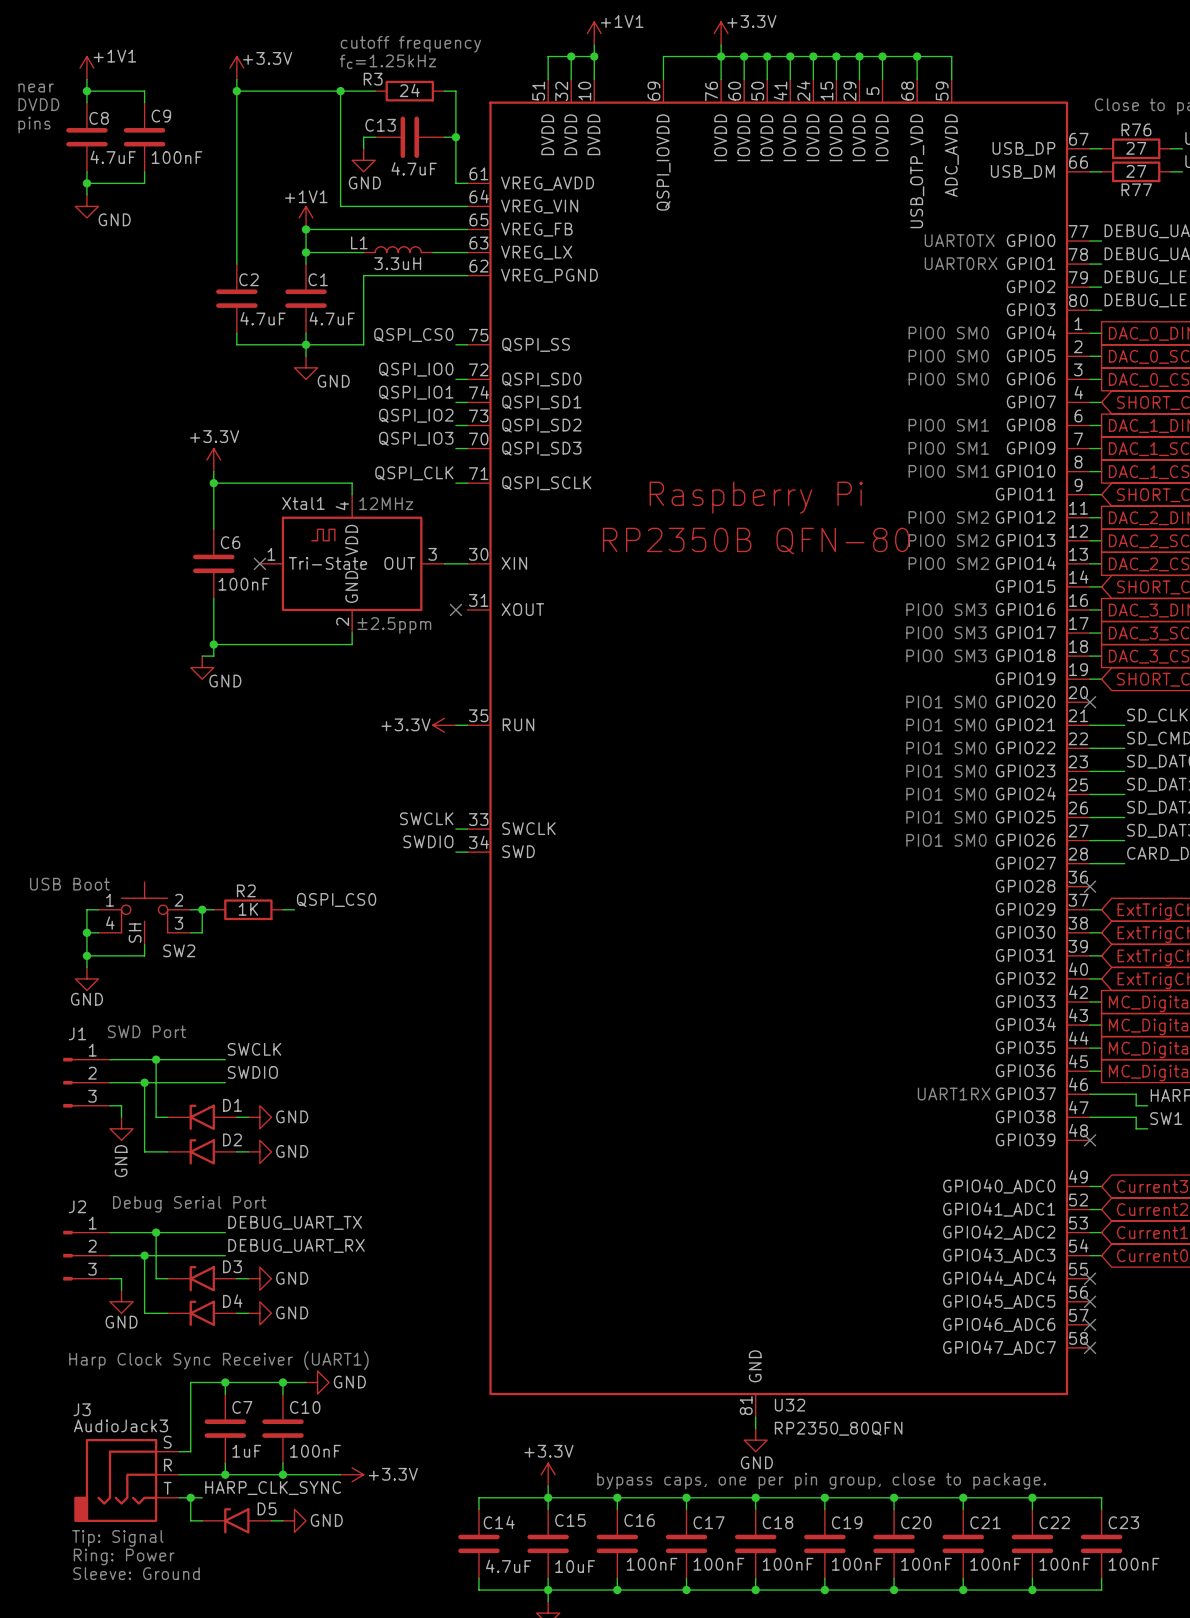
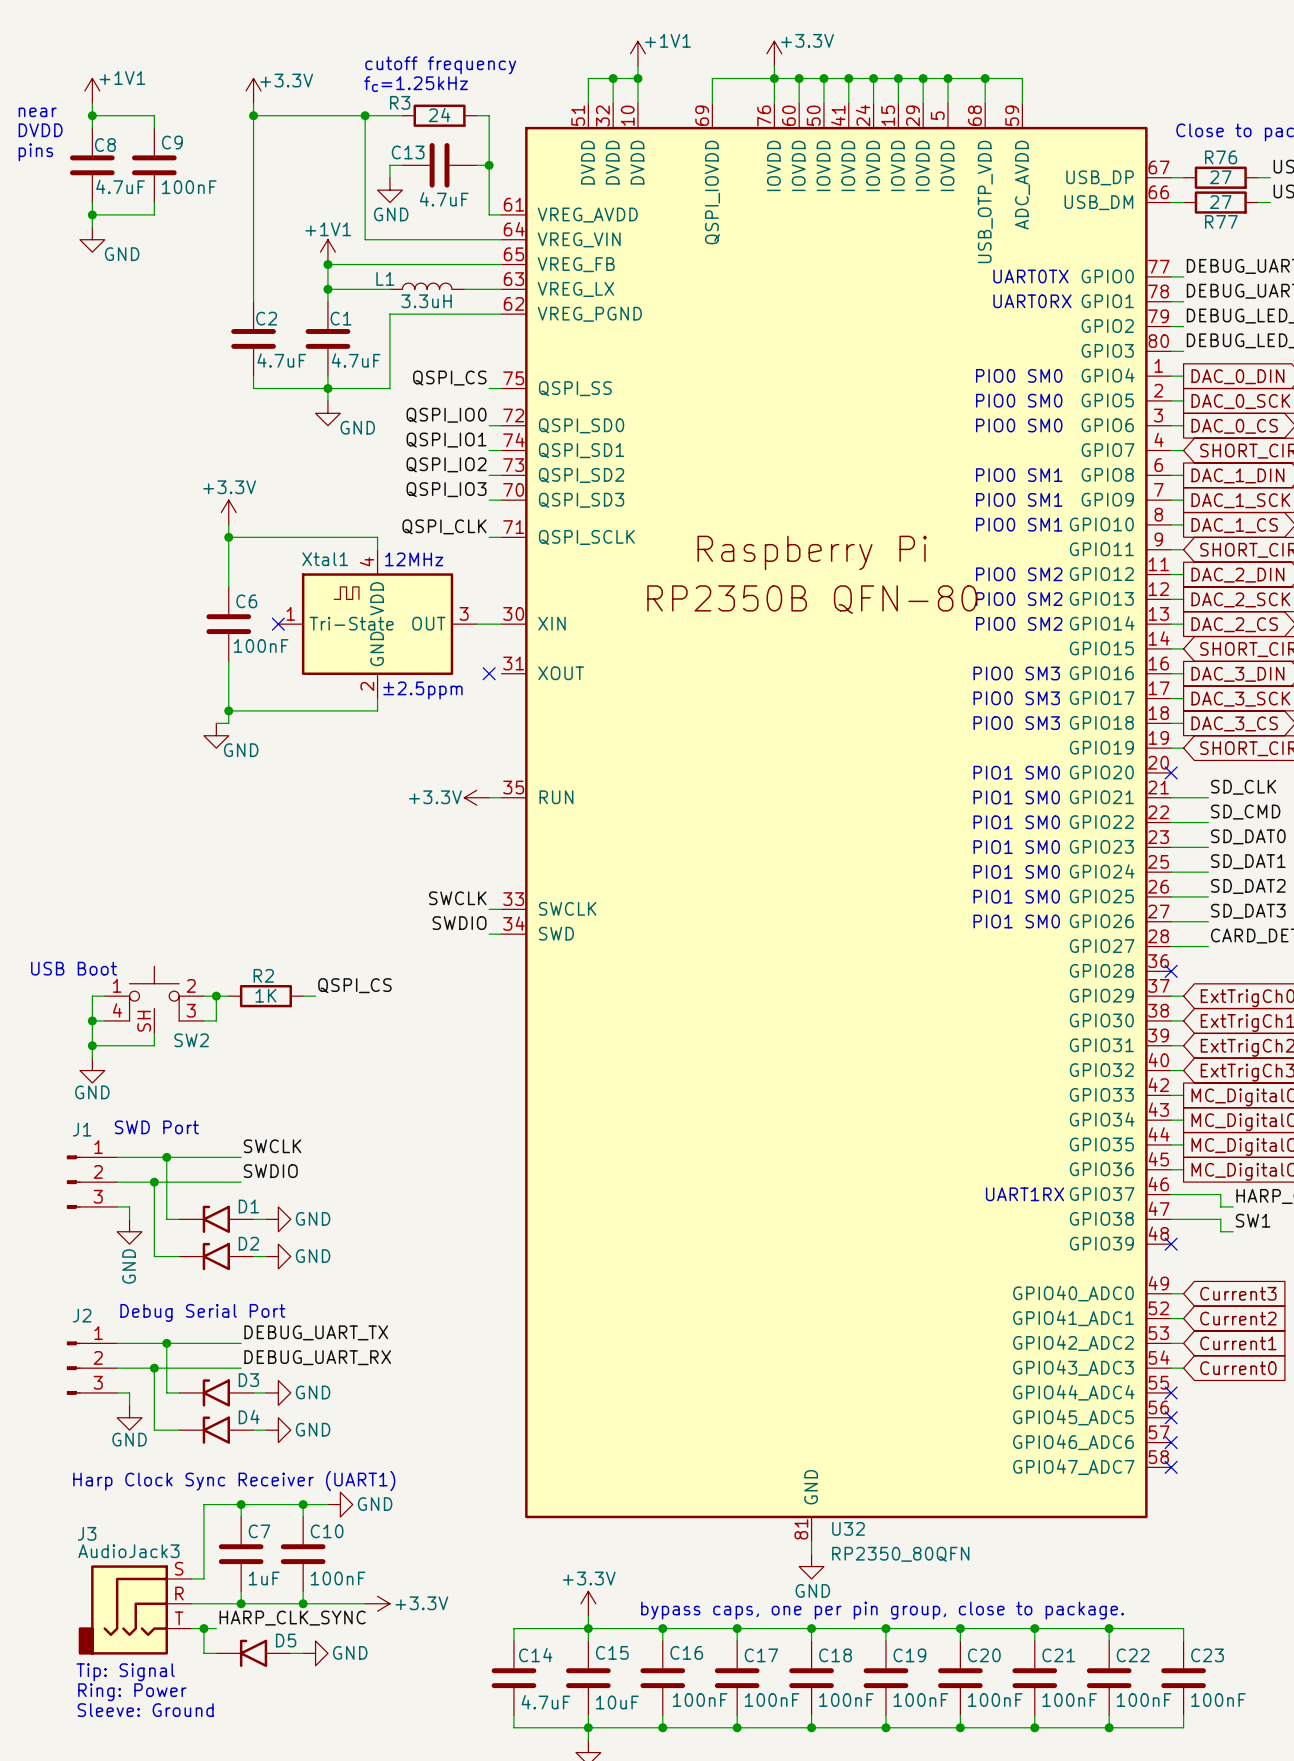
label: QSPI_CS0 (413, 335) -> QSPI_CS (449, 378)
label: QSPI_CS0 (336, 900) -> QSPI_CS (354, 985)

